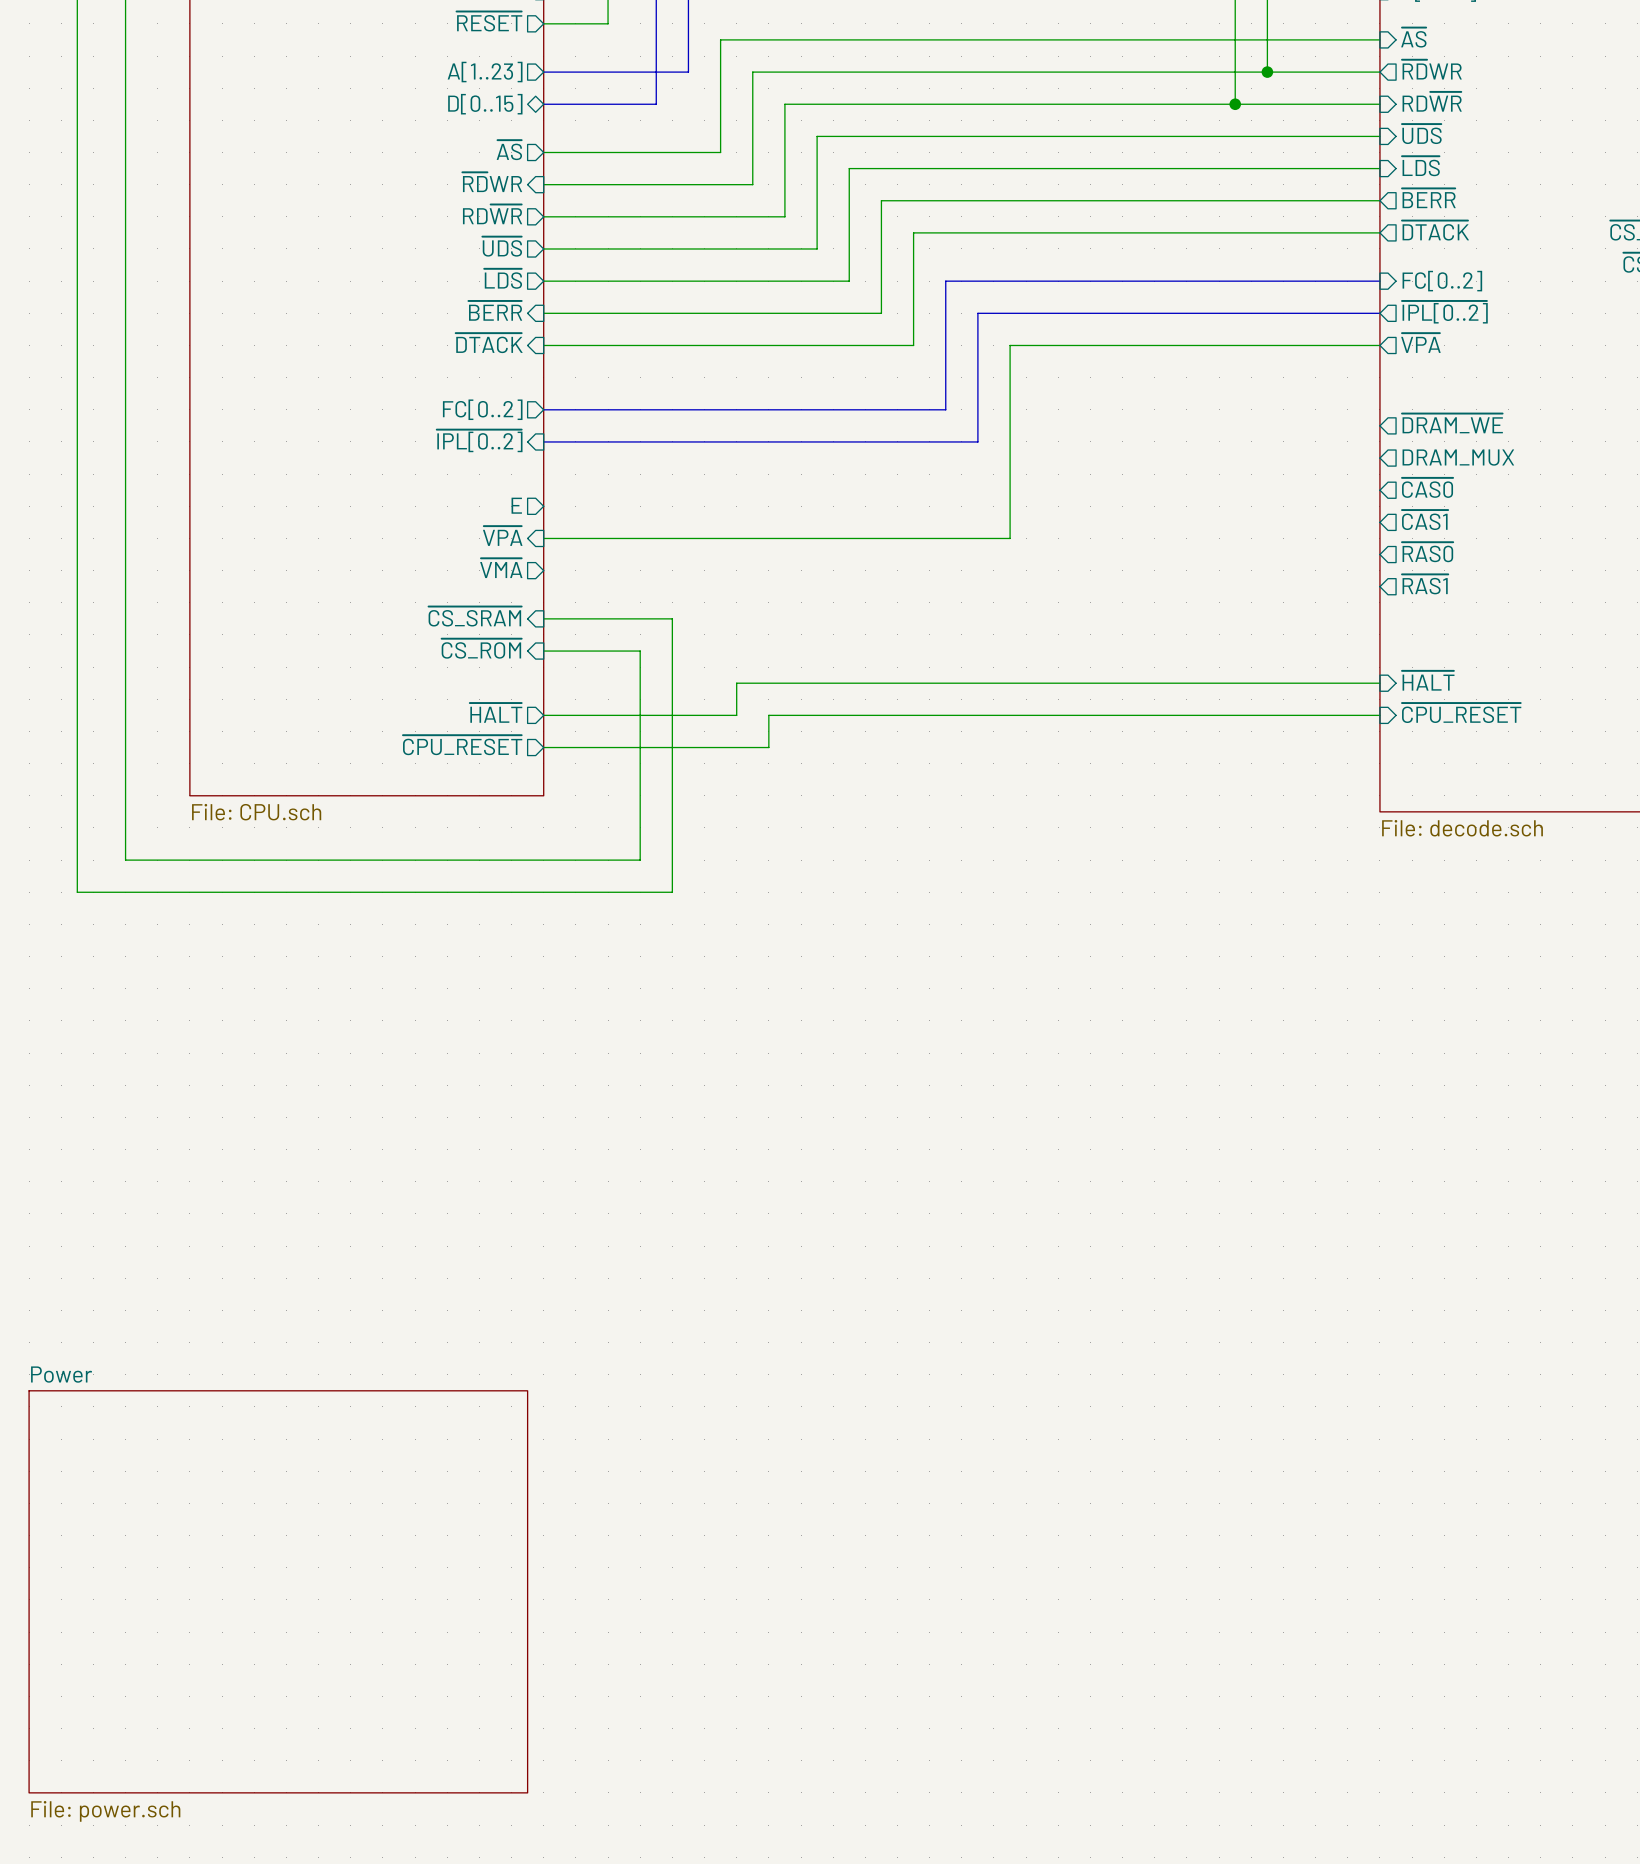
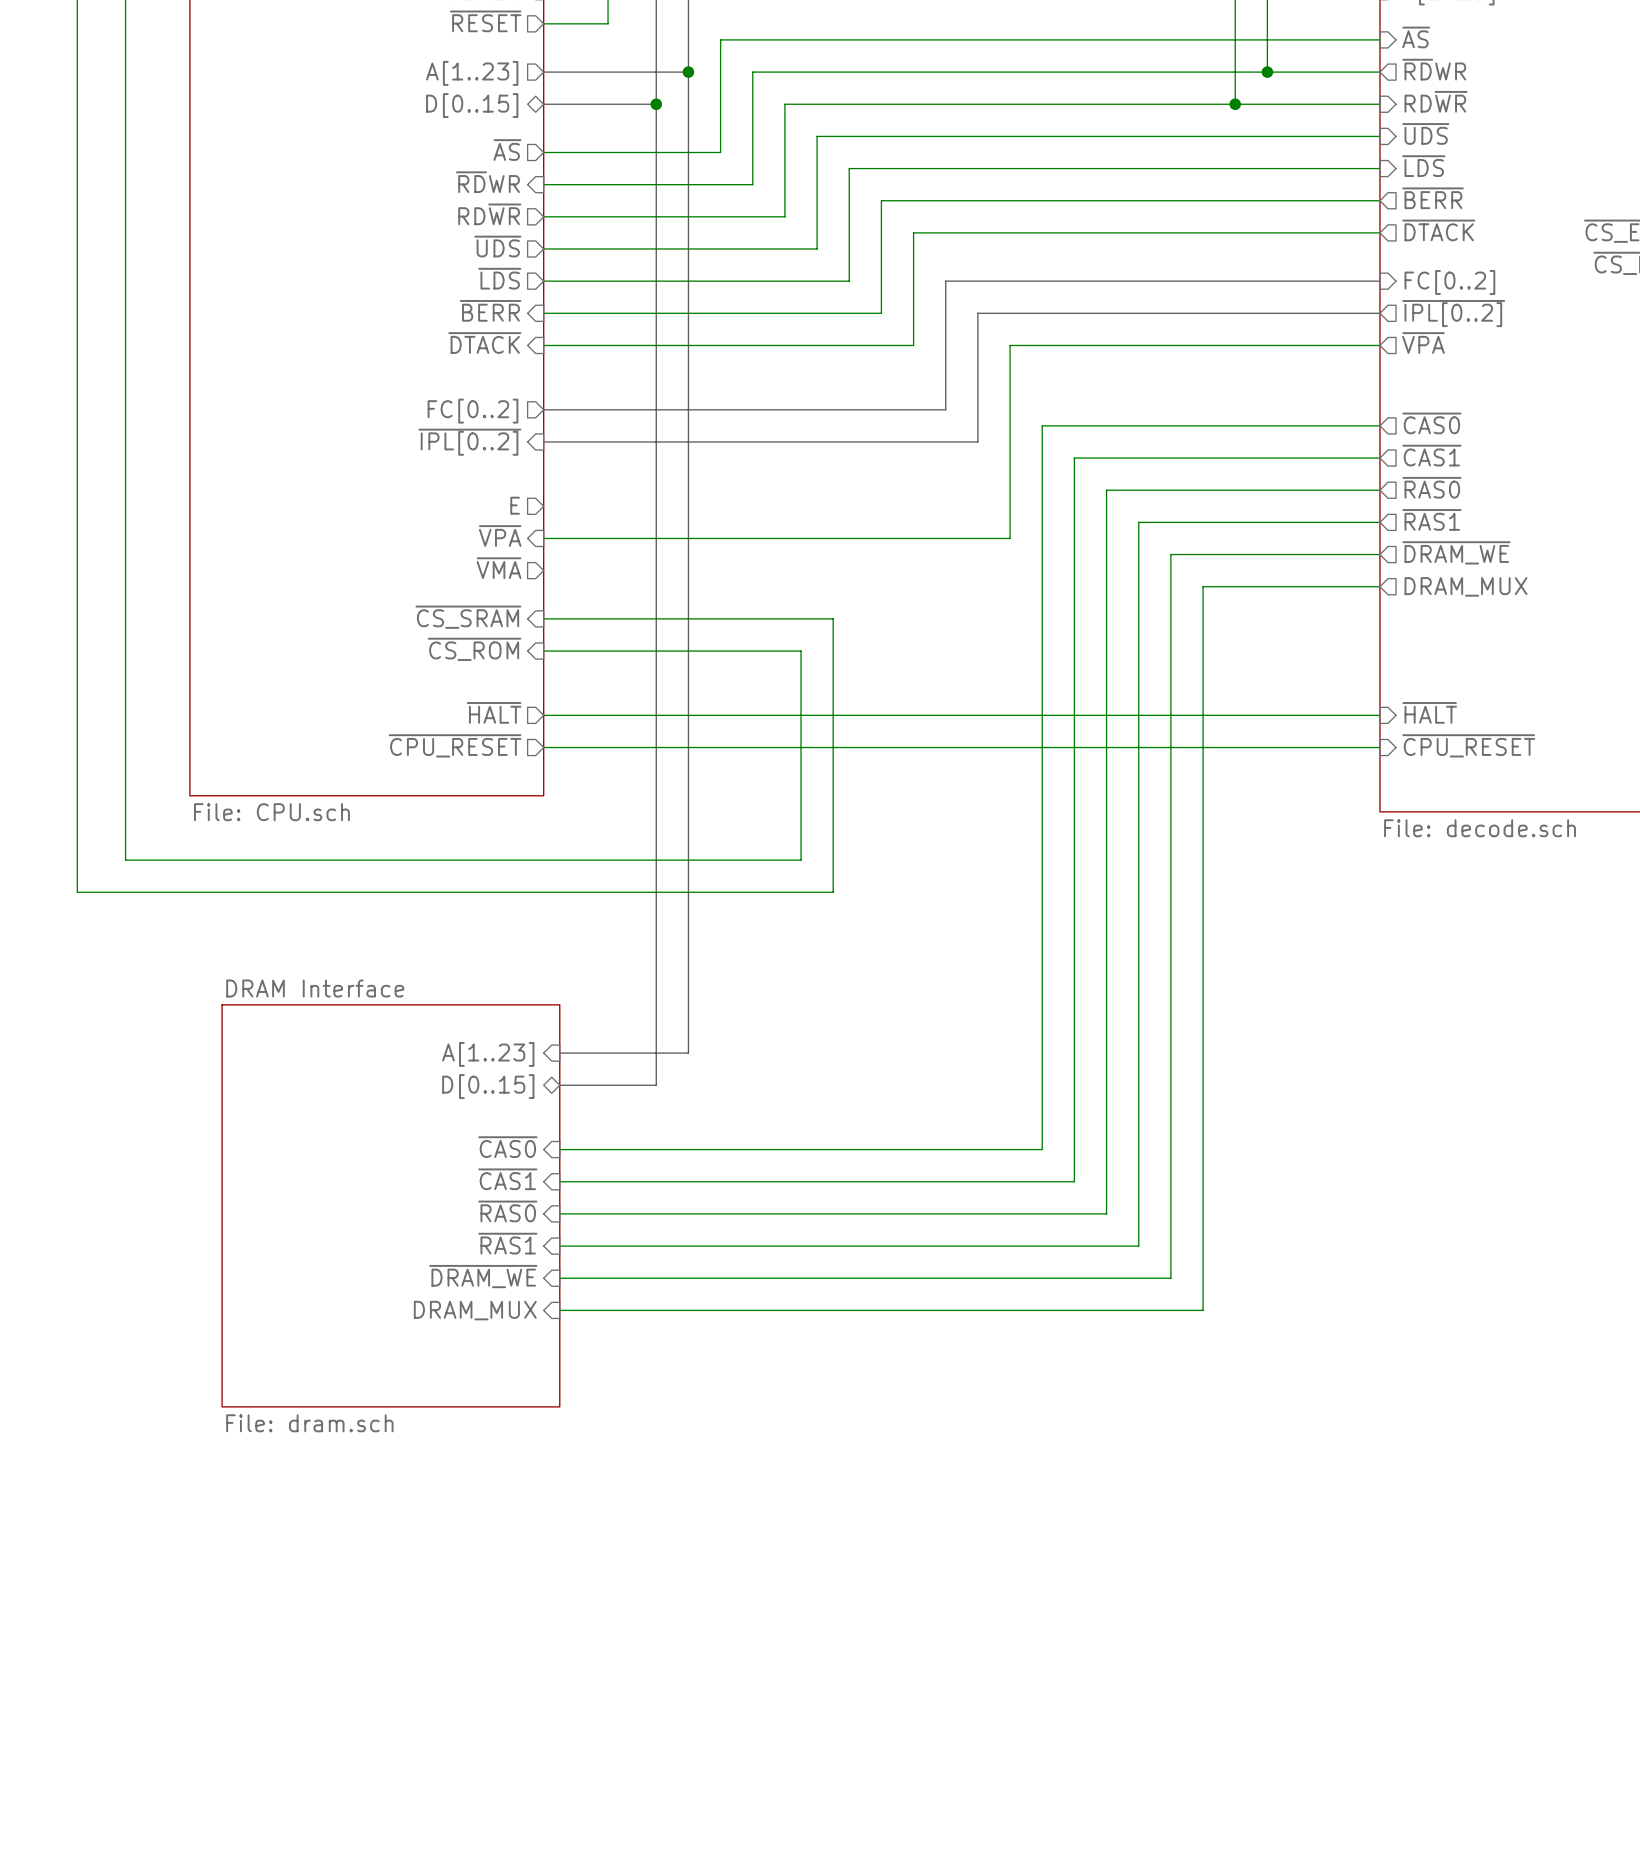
bus: none -> (688, 72) (688, 1053) (559, 1053)
junction: none -> (688, 72)
bus: none -> (656, 104) (656, 1085) (559, 1085)
junction: none -> (656, 104)
sheet pin: ~{DRAM_WE} (1452, 423) -> ~{CAS0} (1431, 423)
wire: none -> (1379, 425) (1042, 425) (1042, 1149) (559, 1149)
sheet pin: DRAM_MUX (1458, 457) -> ~{CAS1} (1431, 455)
wire: none -> (1379, 458) (1074, 458) (1074, 1181) (559, 1181)
sheet pin: ~{CAS0} (1427, 487) -> ~{RAS0} (1431, 487)
wire: none -> (1379, 490) (1106, 490) (1106, 1213) (559, 1213)
sheet pin: ~{CAS1} (1425, 520) -> ~{RAS1} (1431, 519)
wire: none -> (1379, 522) (1138, 522) (1138, 1246) (559, 1246)
sheet pin: ~{RAS0} (1427, 552) -> ~{DRAM_WE} (1456, 552)
wire: none -> (1379, 554) (1170, 554) (1170, 1278) (559, 1278)
sheet pin: ~{RAS1} (1425, 584) -> DRAM_MUX (1465, 586)
wire: none -> (1379, 586) (1203, 586) (1203, 1310) (559, 1310)
wire: (672, 618) (672, 892) -> (672, 618) (833, 618) (833, 892) (672, 892)
wire: (640, 651) (640, 860) -> (640, 651) (801, 651) (801, 860) (640, 860)
sheet pin: ~{HALT} (1428, 680) -> none
wire: (1379, 683) (736, 683) (736, 715) -> none
sheet pin: ~{CPU_RESET} (1461, 713) -> ~{HALT} (1429, 712)
wire: (768, 715) (768, 747) -> (768, 715) (736, 715)
sheet pin: none -> ~{CPU_RESET} (1468, 745)
wire: none -> (768, 747) (1379, 747)
sheet pin: none -> A[1..23] (488, 1054)
sheet pin: none -> D[0..15] (488, 1086)
sheet pin: none -> ~{CAS0} (507, 1147)
sheet pin: none -> ~{CAS1} (507, 1179)
sheet DRAM Interface: none -> File: dram.sch (390, 1205)
sheet pin: none -> ~{RAS0} (507, 1211)
sheet pin: none -> ~{RAS1} (507, 1243)
sheet pin: none -> ~{DRAM_WE} (483, 1276)
sheet pin: none -> DRAM_MUX (475, 1310)
sheet Power: File: power.sch (278, 1591) -> none

